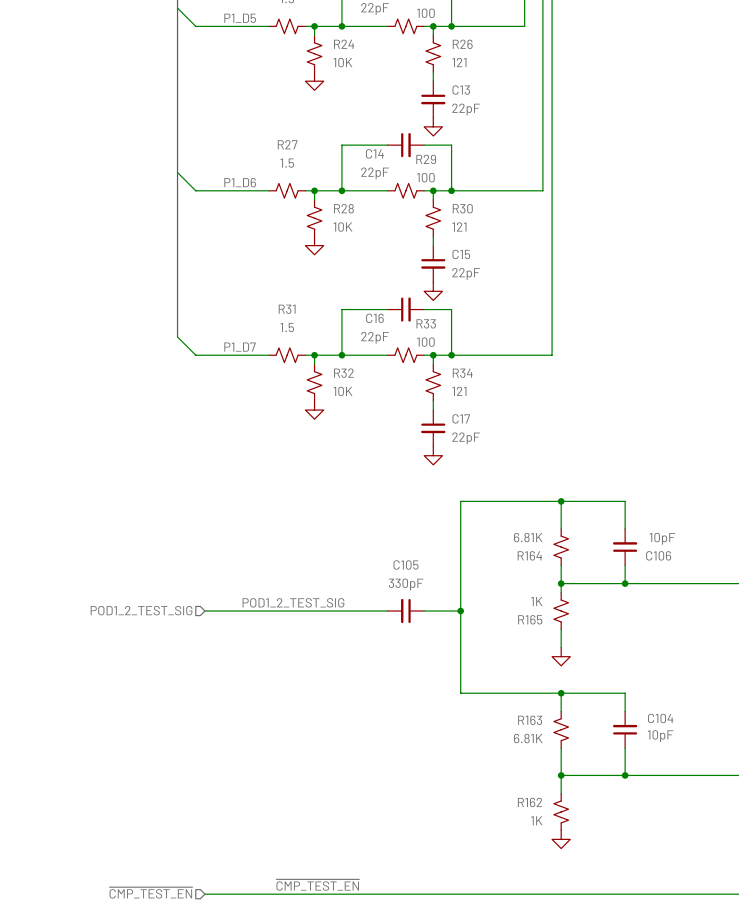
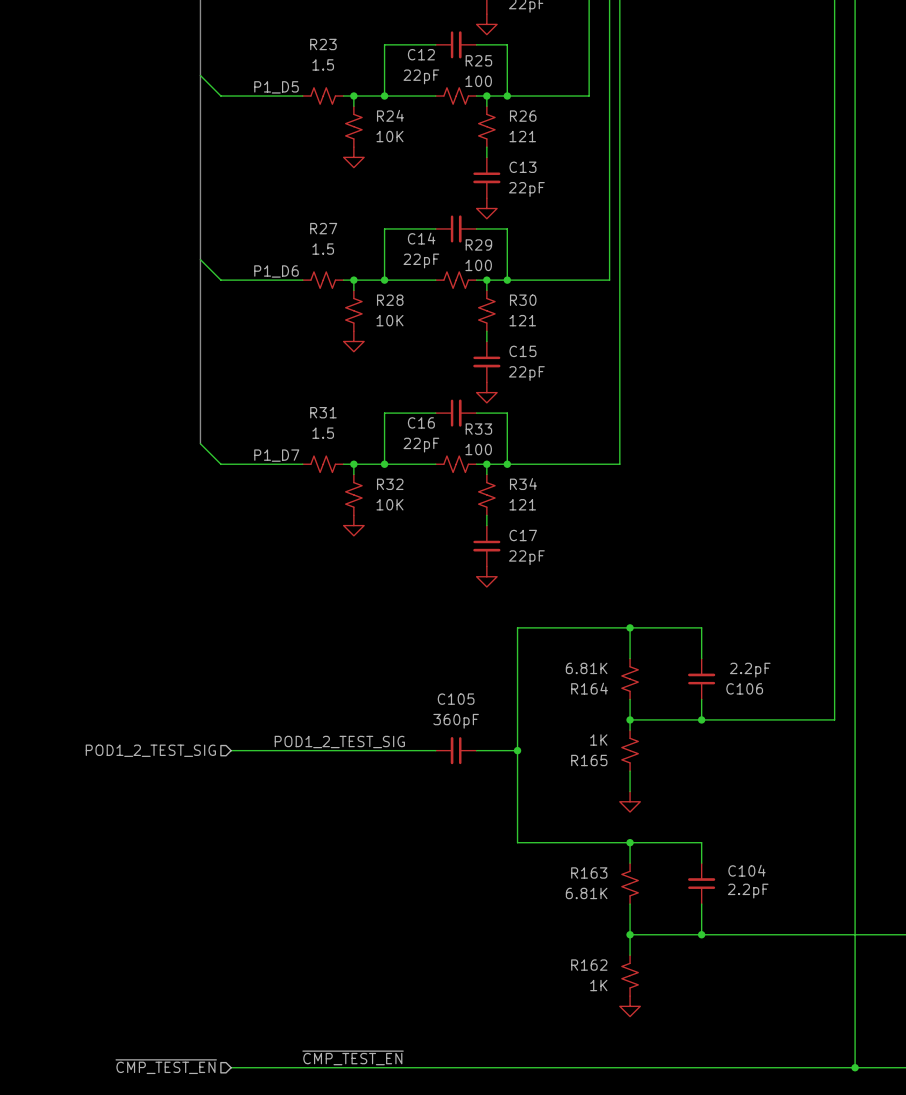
C106 value: 10pF (662, 538) -> 2.2pF (750, 670)
C105 value: 330pF (406, 584) -> 360pF (456, 721)
C104 value: 10pF (660, 736) -> 2.2pF (748, 891)

